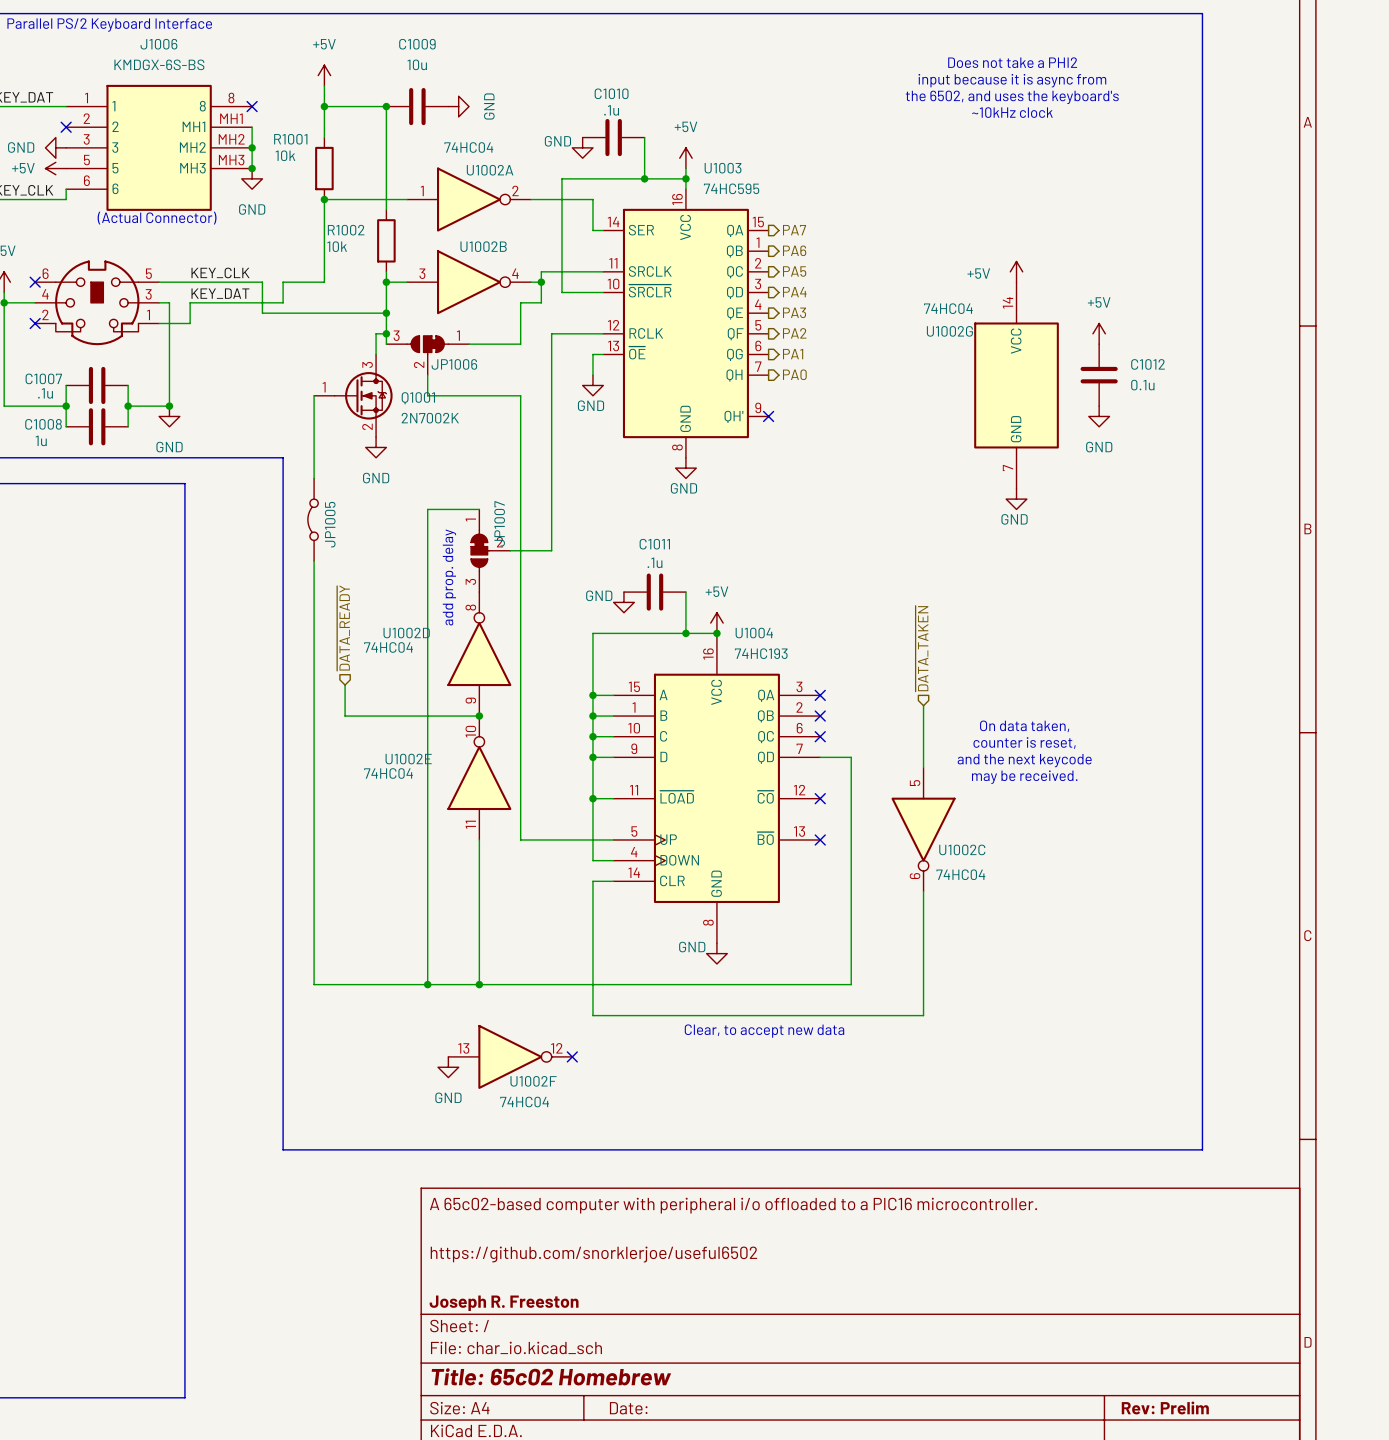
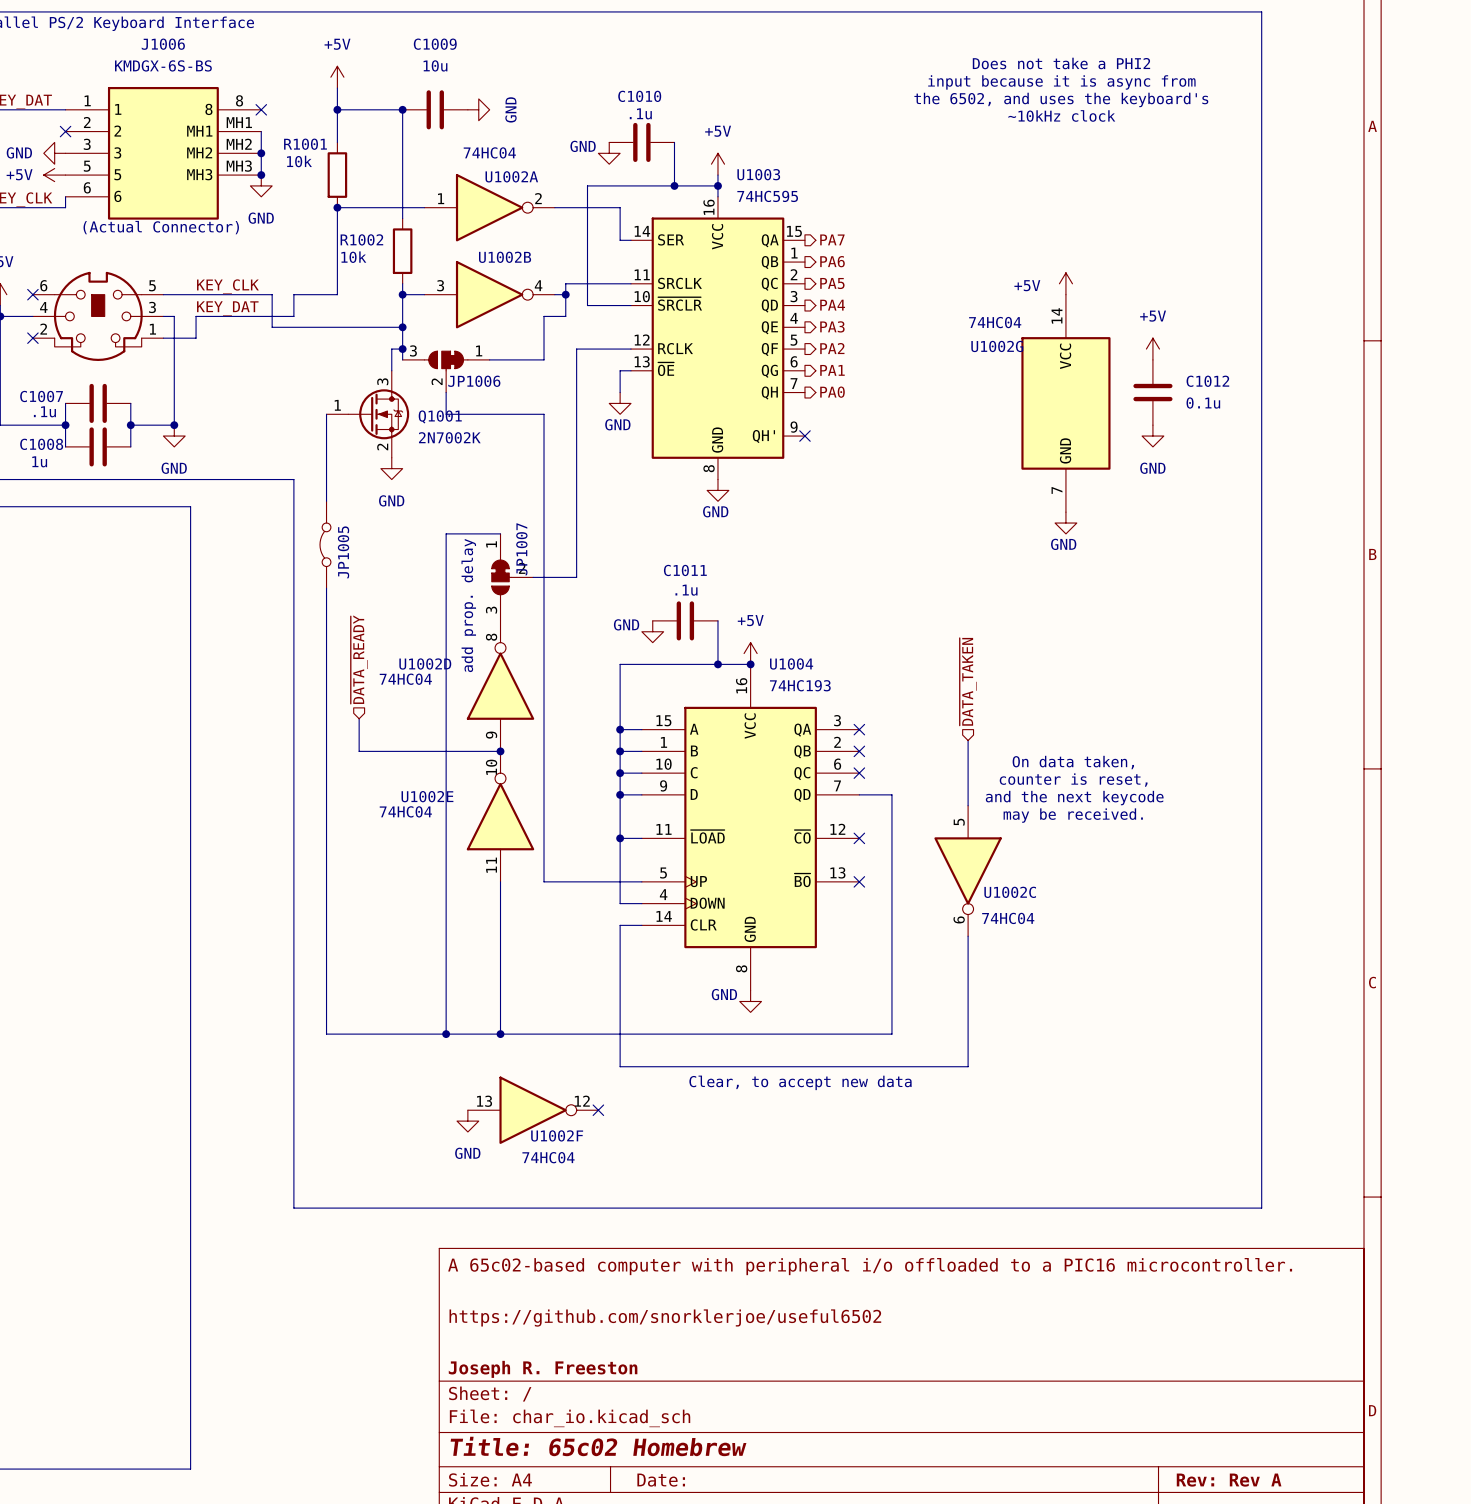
title block: Rev: Prelim (1165, 1407) -> Rev: Rev A (1229, 1480)

